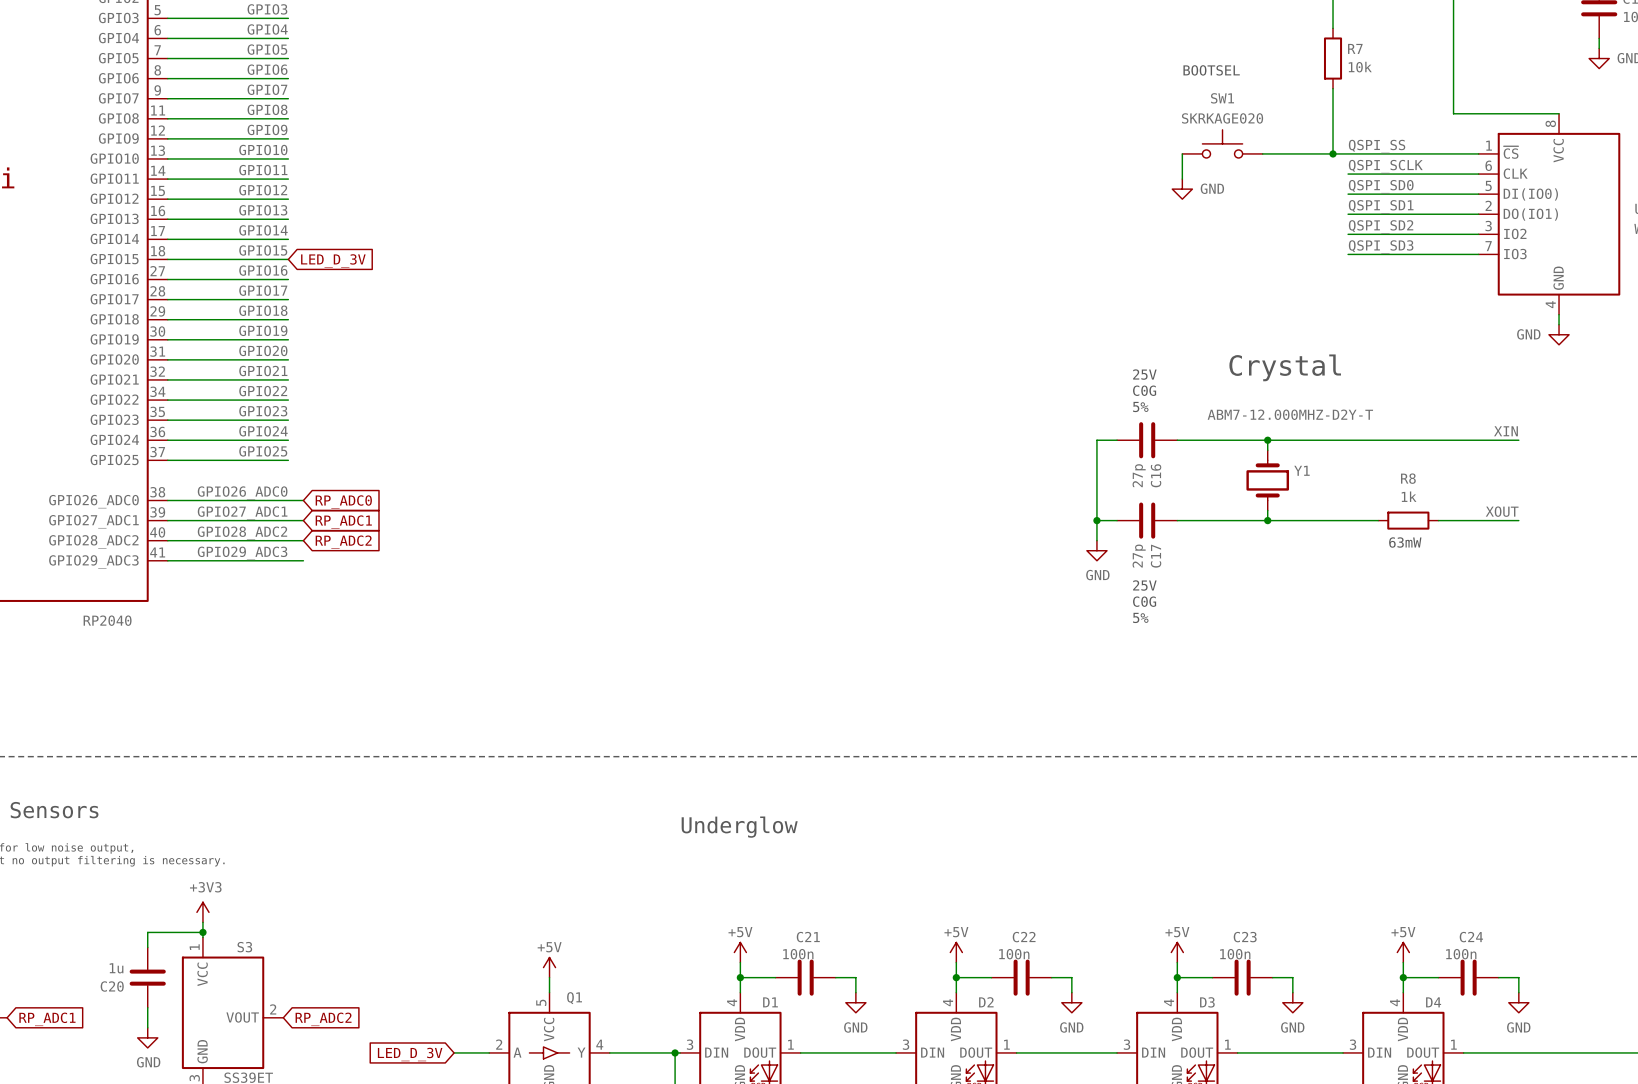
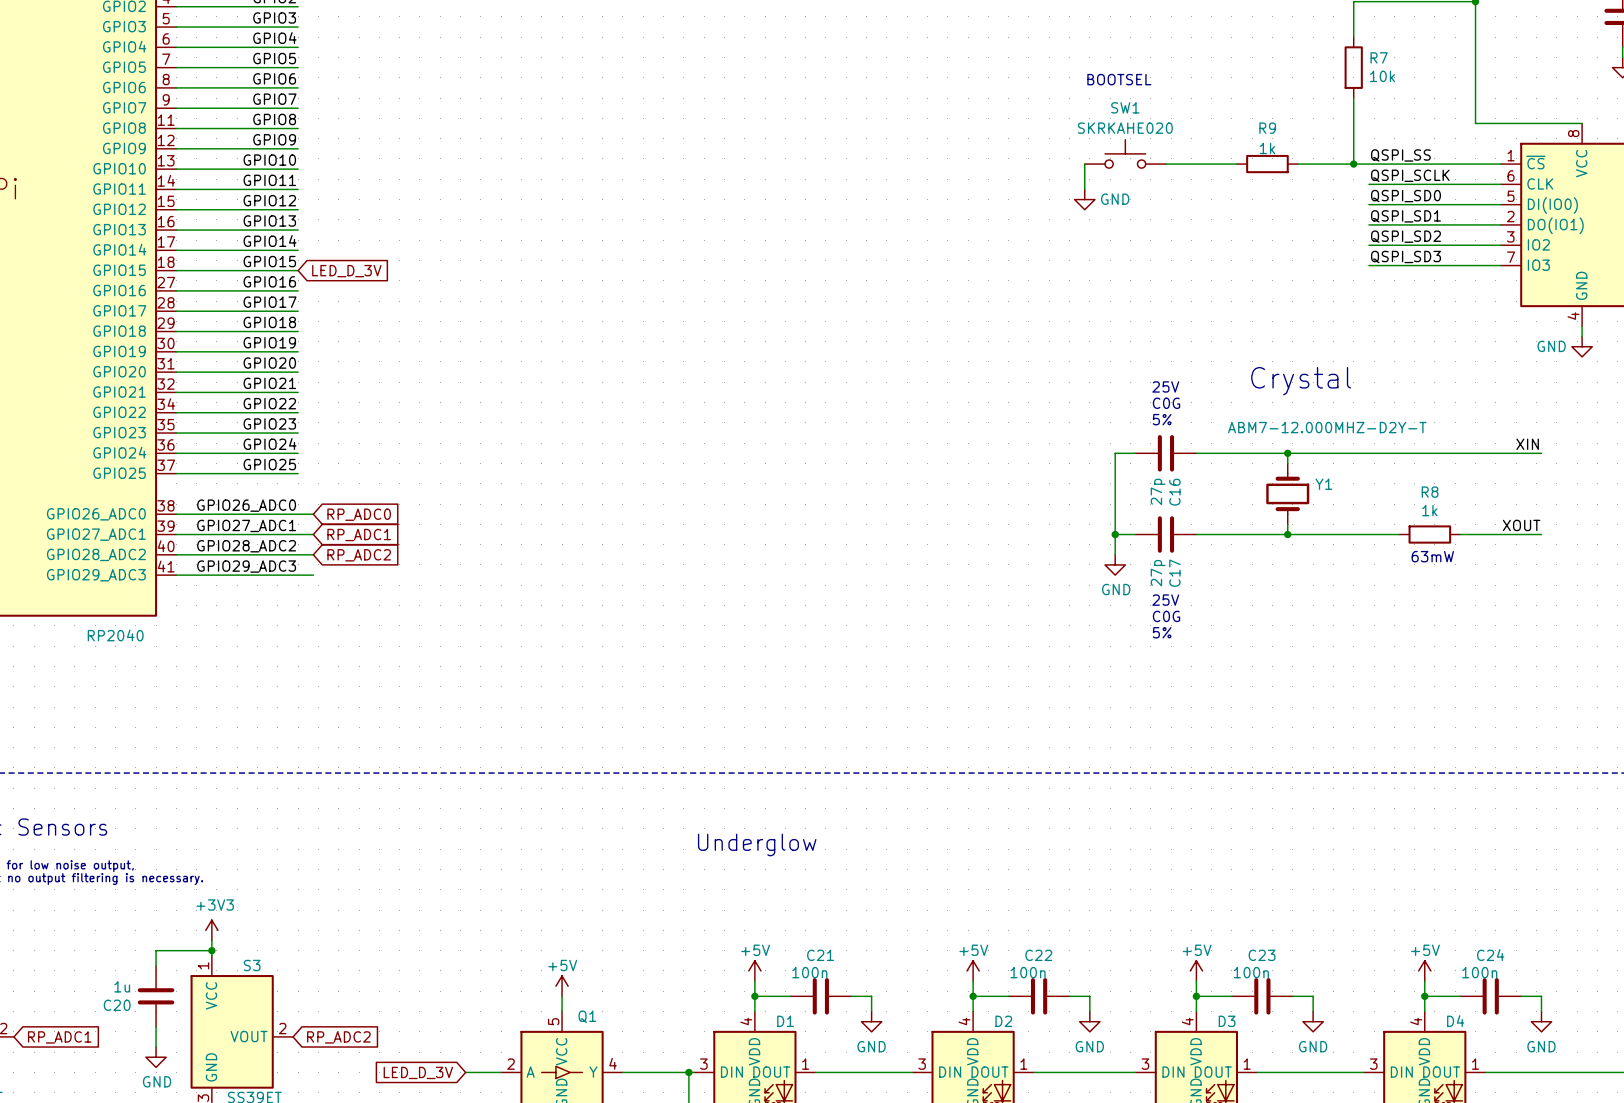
text position: BOOTSEL (1211, 70) -> BOOTSEL (1119, 79)
SW1 value: SKRKAGE020 (1222, 118) -> SKRKAHE020 (1125, 128)
SW1 position: (1222, 143) -> (1125, 153)
wire: none -> (1165, 164) (1236, 164)
wire: (1182, 153) (1182, 179) -> (1084, 164) (1084, 189)
R9: none -> 1k (1267, 164)
power symbol position: GND (1182, 189) -> GND (1084, 199)

